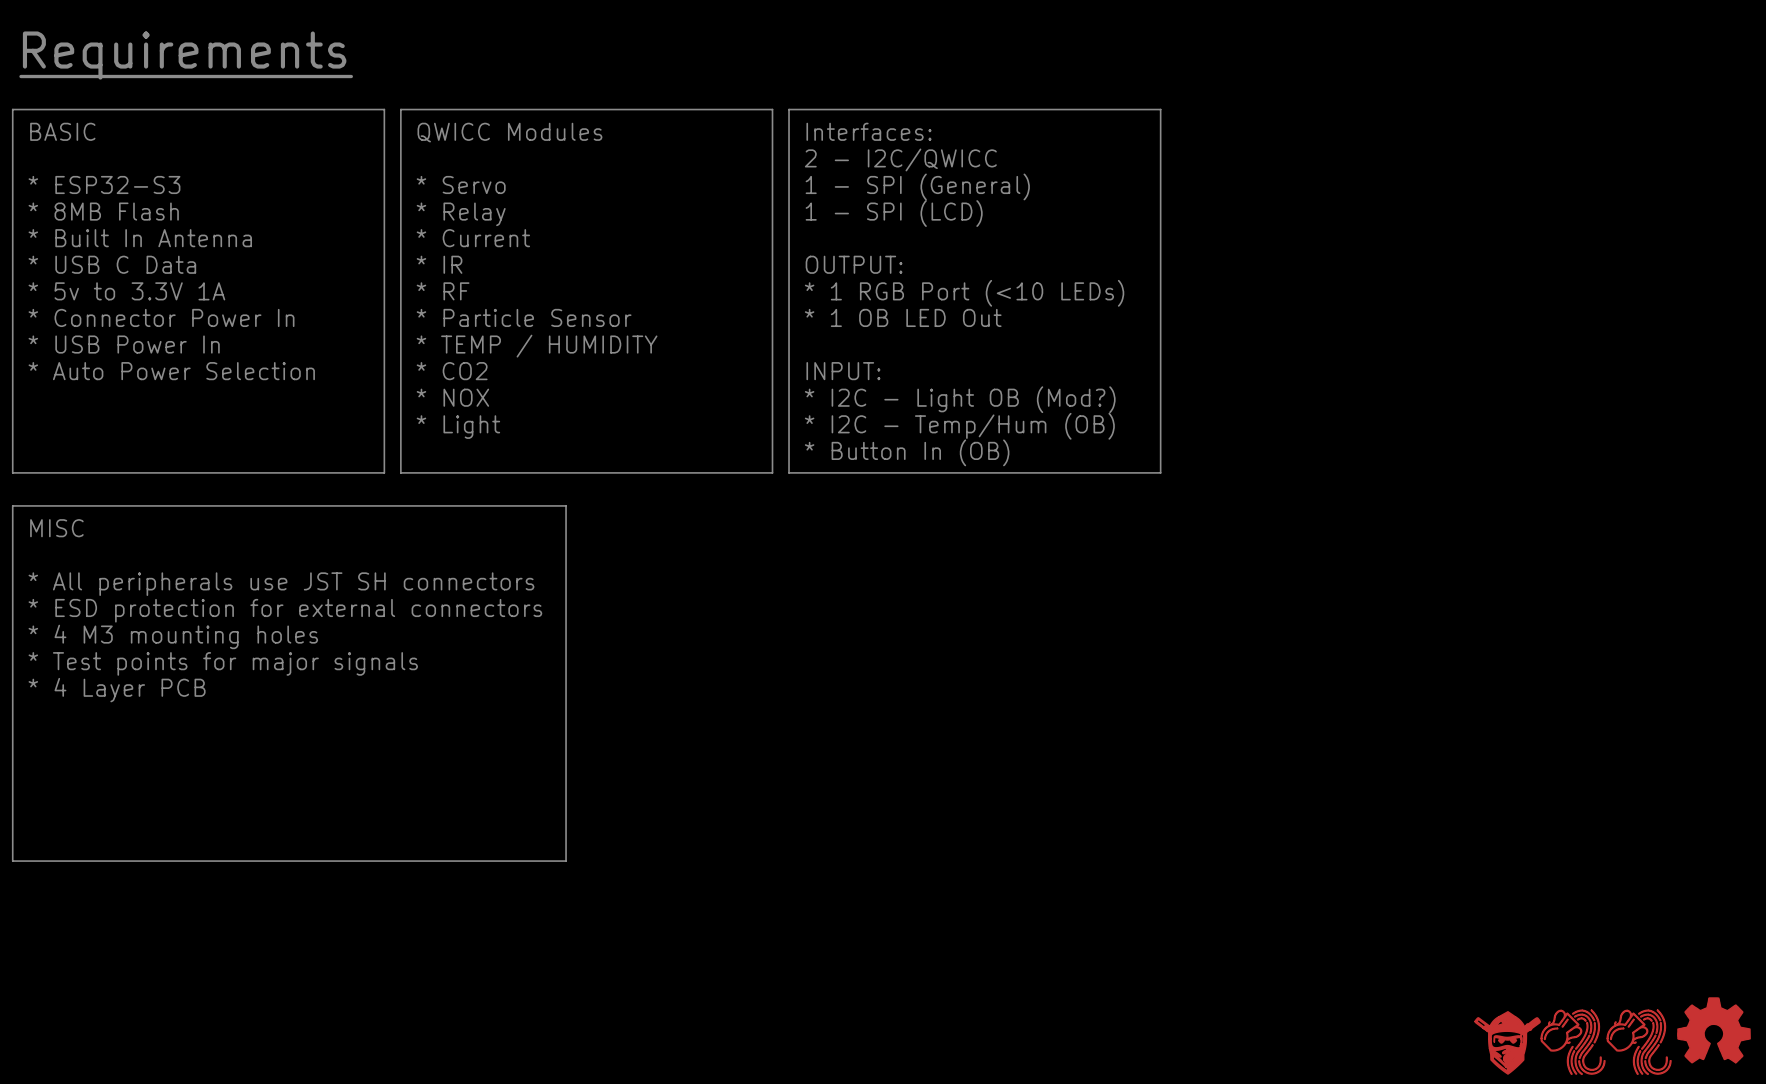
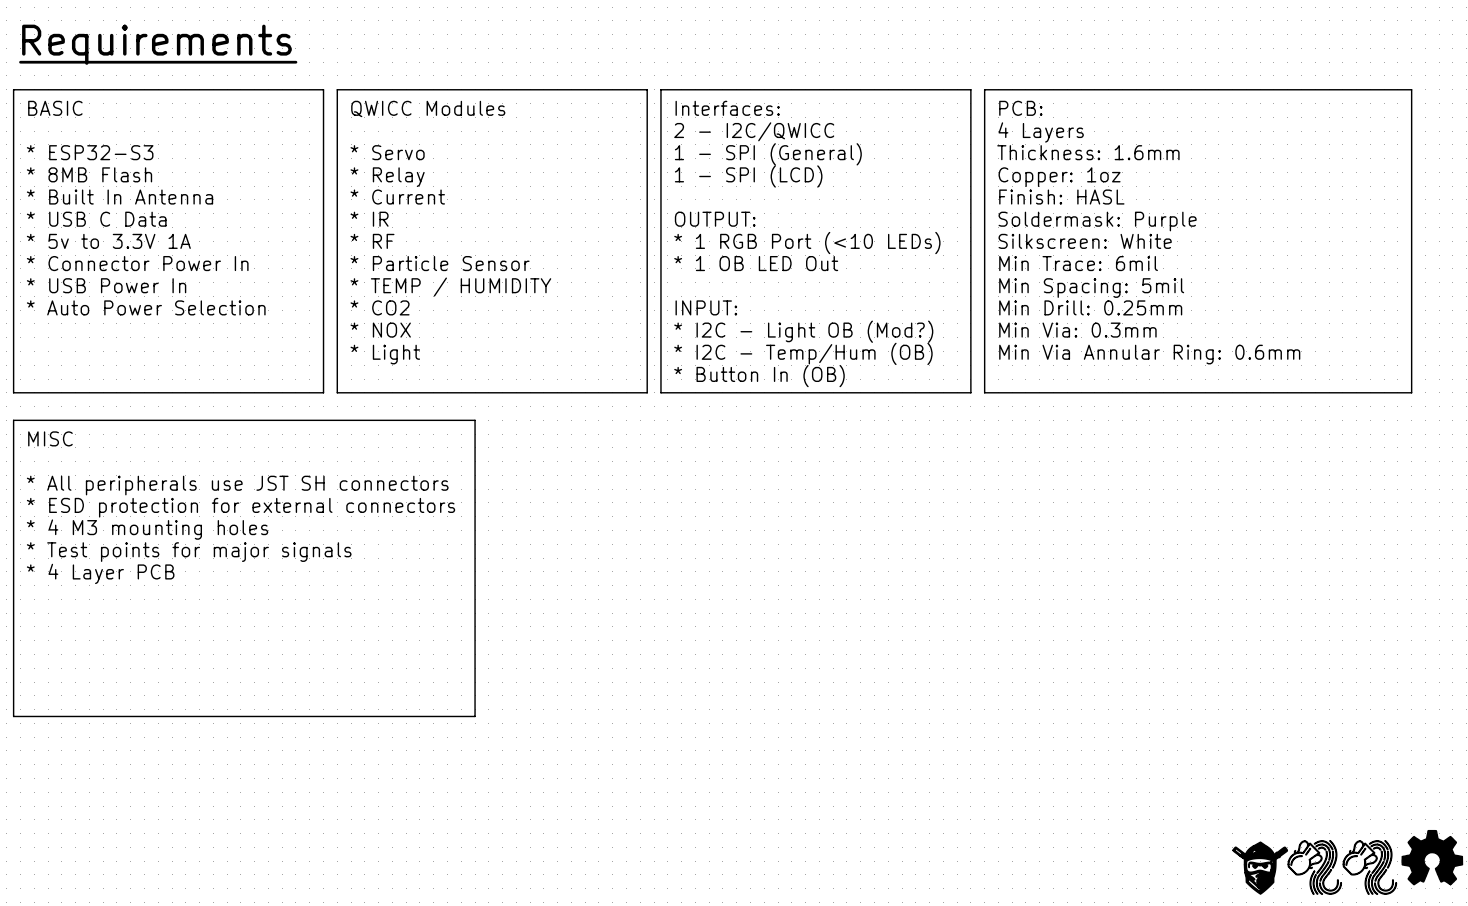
line: none -> (984, 89) (1411, 89) (1411, 392) (984, 392) (984, 89)
text: none -> PCB: (1020, 108)
text: none -> 4 Layers (1041, 132)
text: none -> Thickness: 1.6mm (1088, 152)
text: none -> Copper: 1oz (1059, 177)
text: none -> Finish: HASL (1061, 197)
text: none -> Soldermask: Purple (1097, 221)
text: none -> Silkscreen: White (1085, 241)
text: none -> Min Trace: 6mil (1078, 263)
text: none -> Min Spacing: 5mil (1091, 288)
text: none -> Min Drill: 0.25mm (1090, 307)
text: none -> Min Via: 0.3mm (1077, 330)
text: none -> Min Via Annular Ring: 0.6mm (1149, 354)

